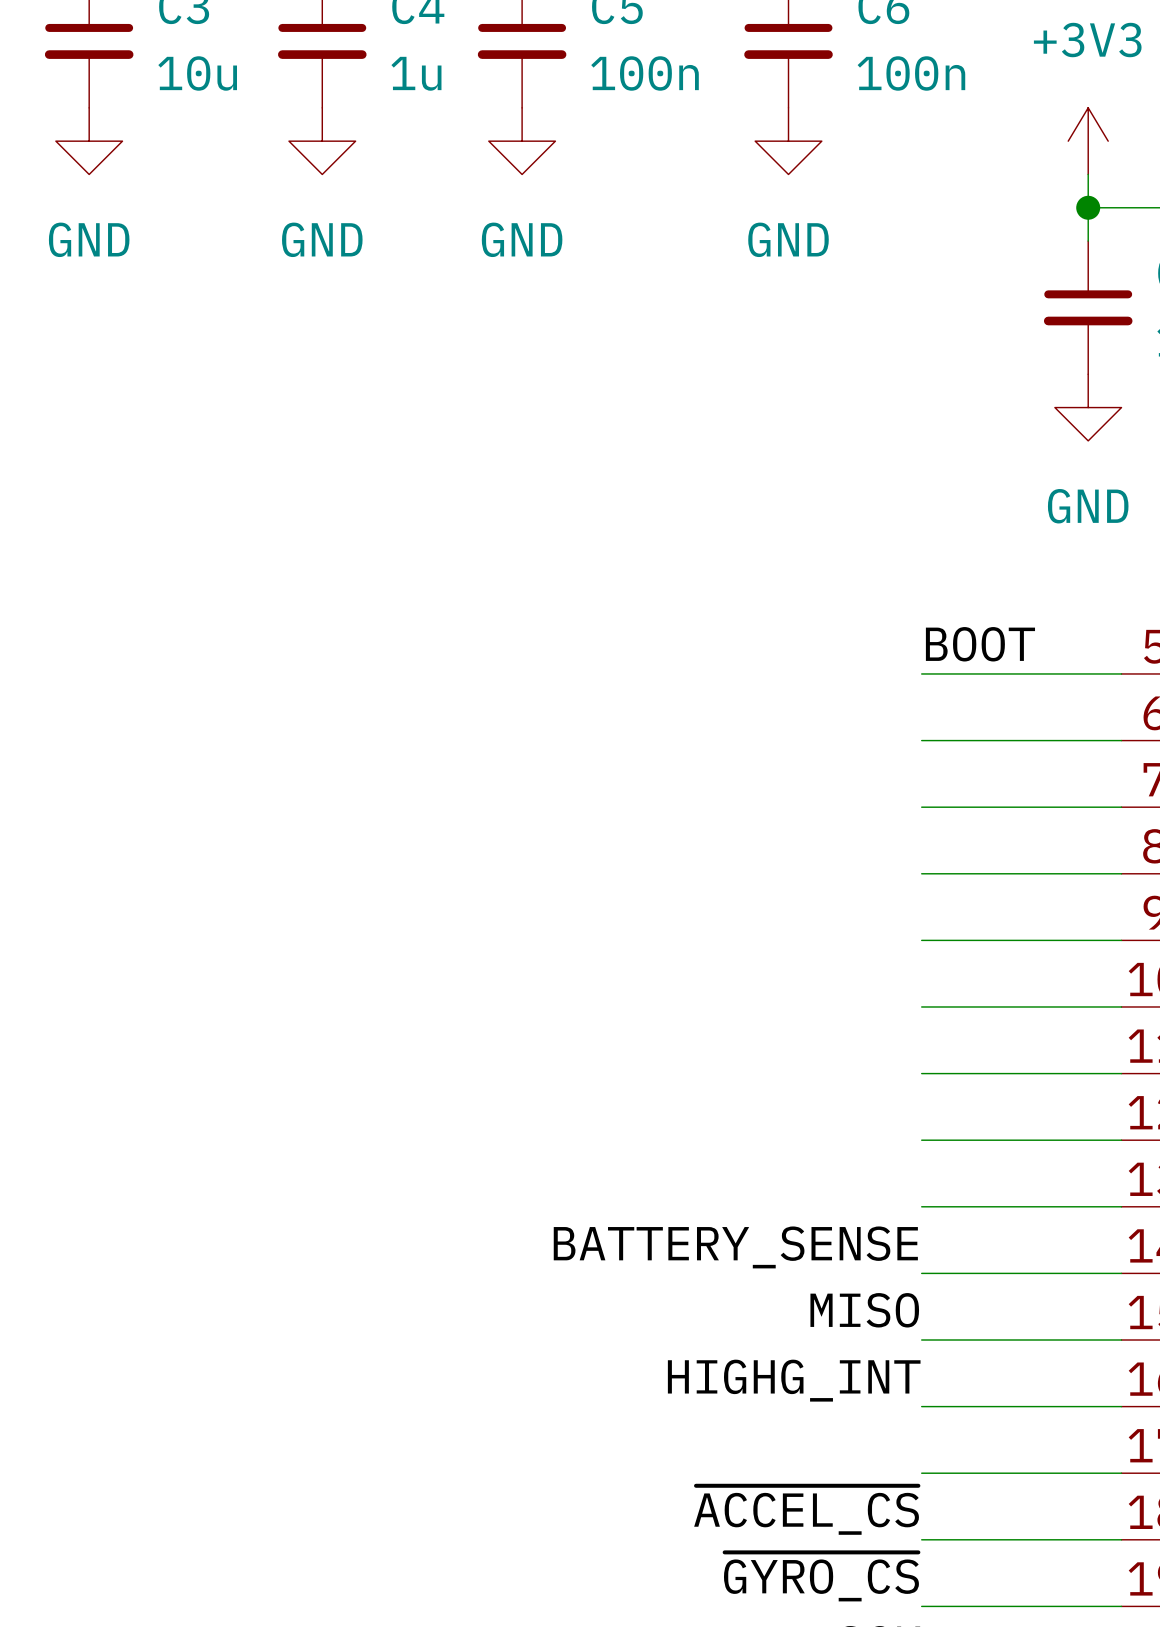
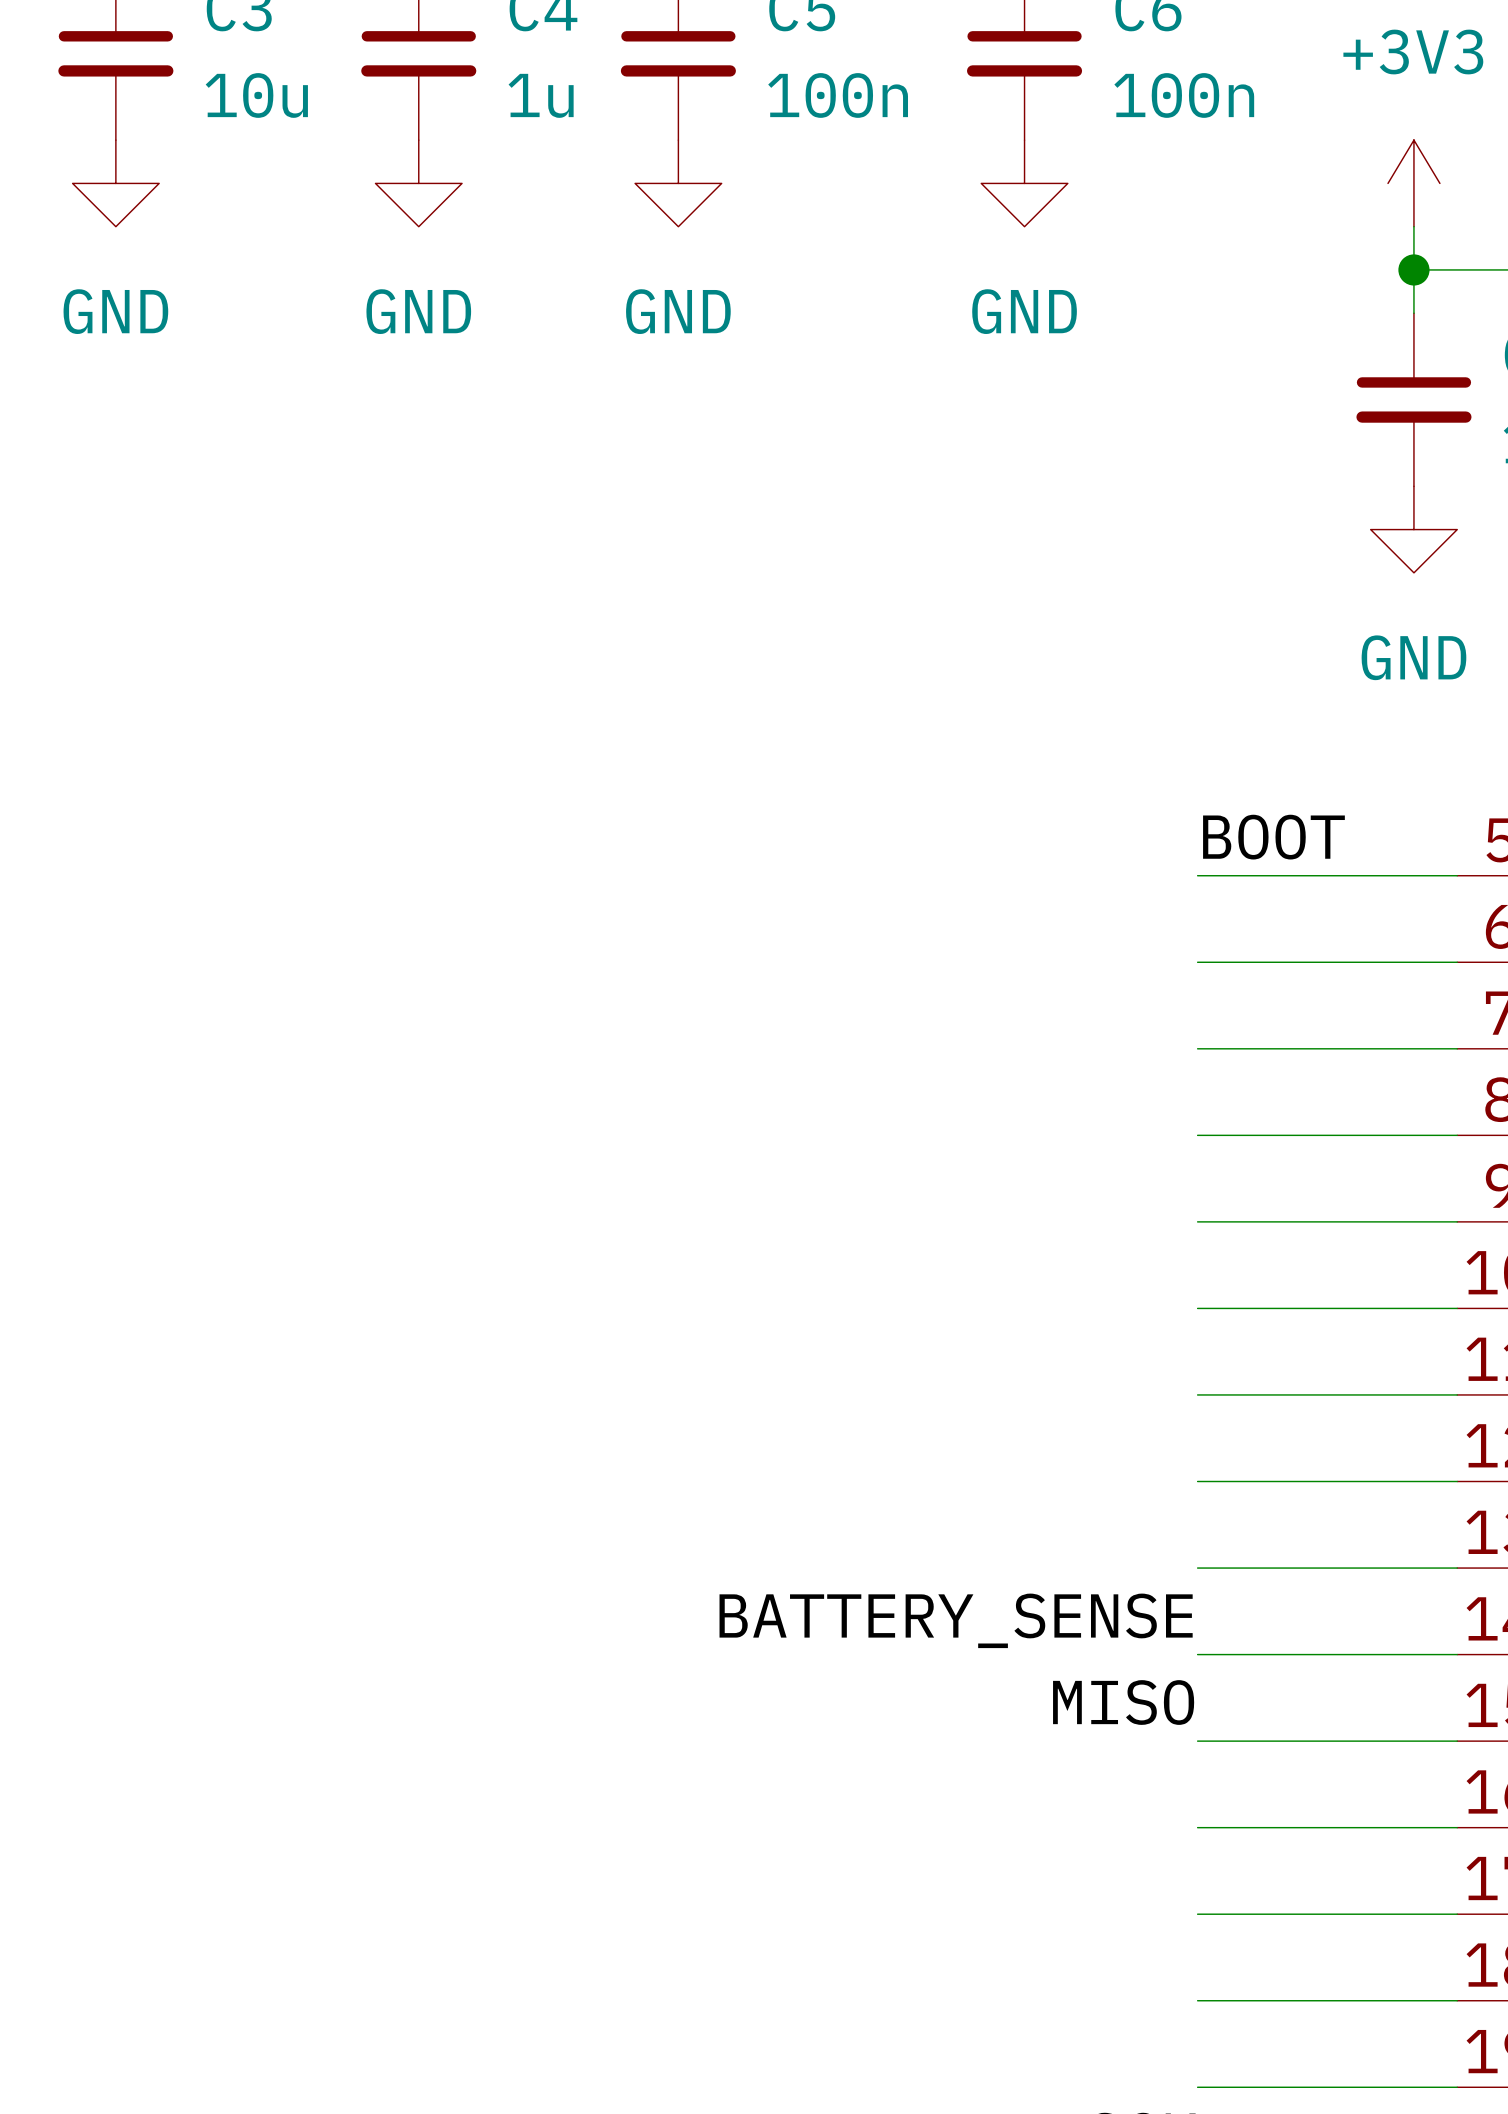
label: HIGHG_INT (794, 1380) -> none
label: ~{ACCEL_CS} (806, 1510) -> none
label: ~{GYRO_CS} (821, 1576) -> none

